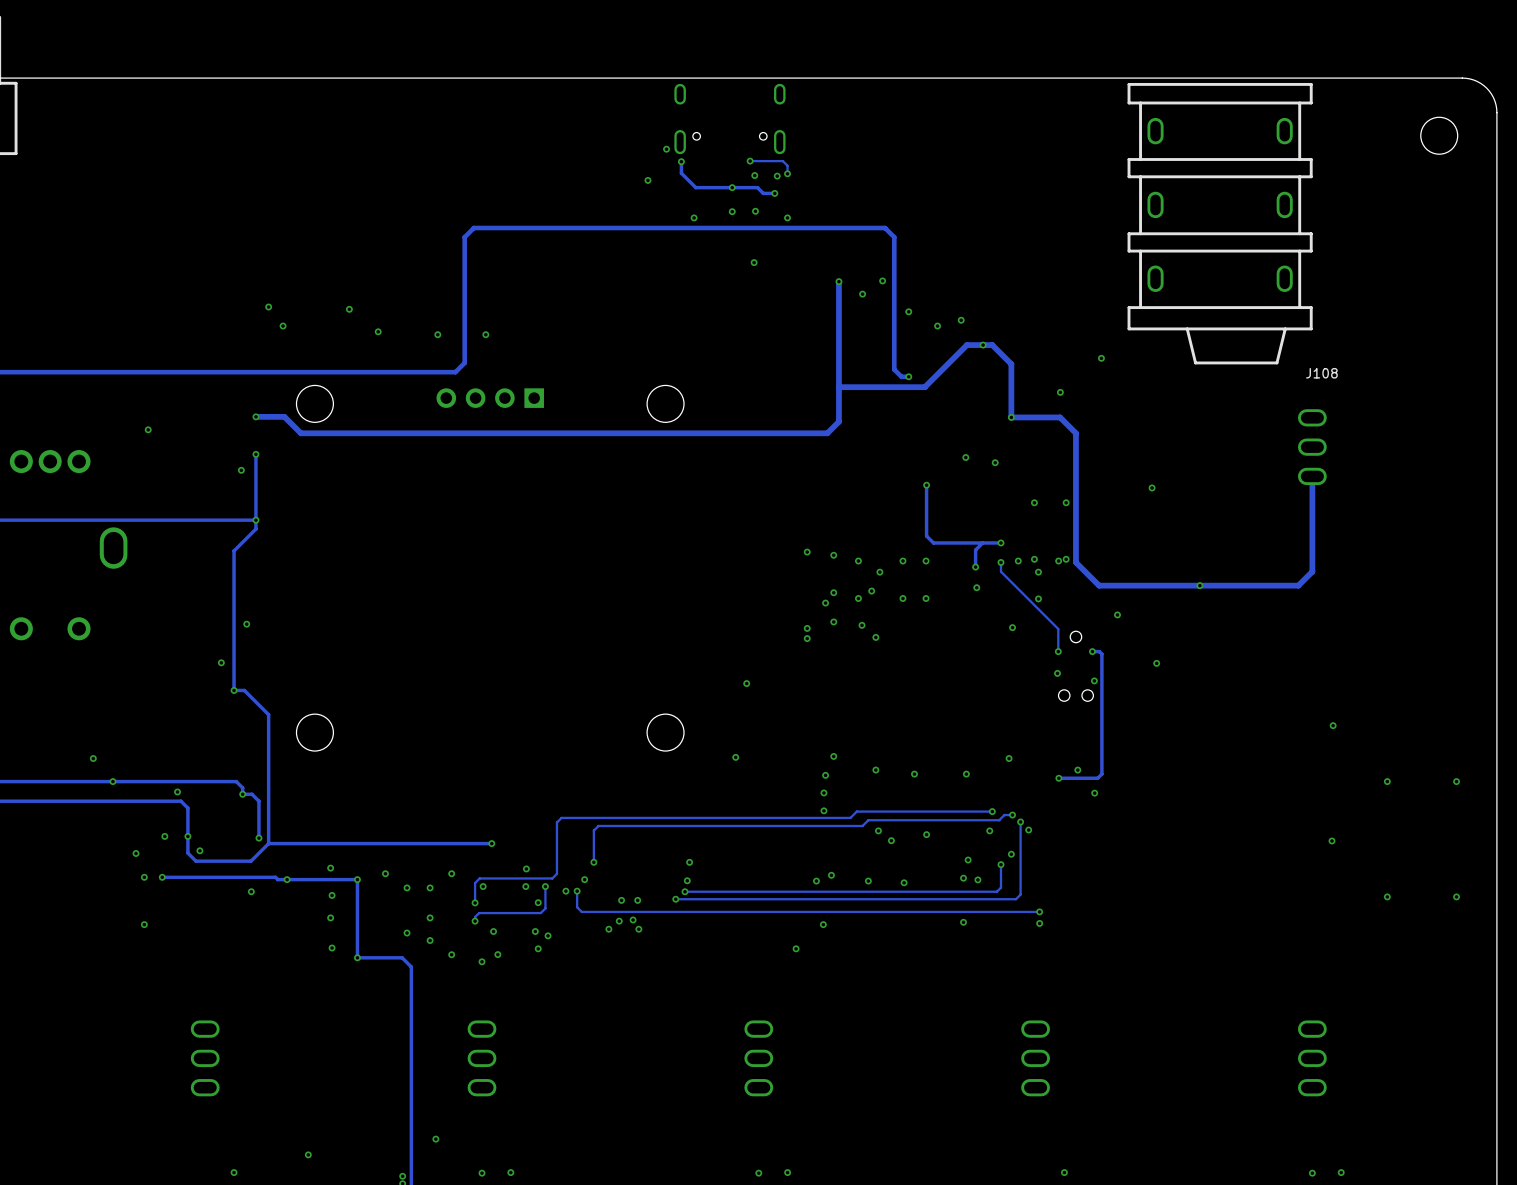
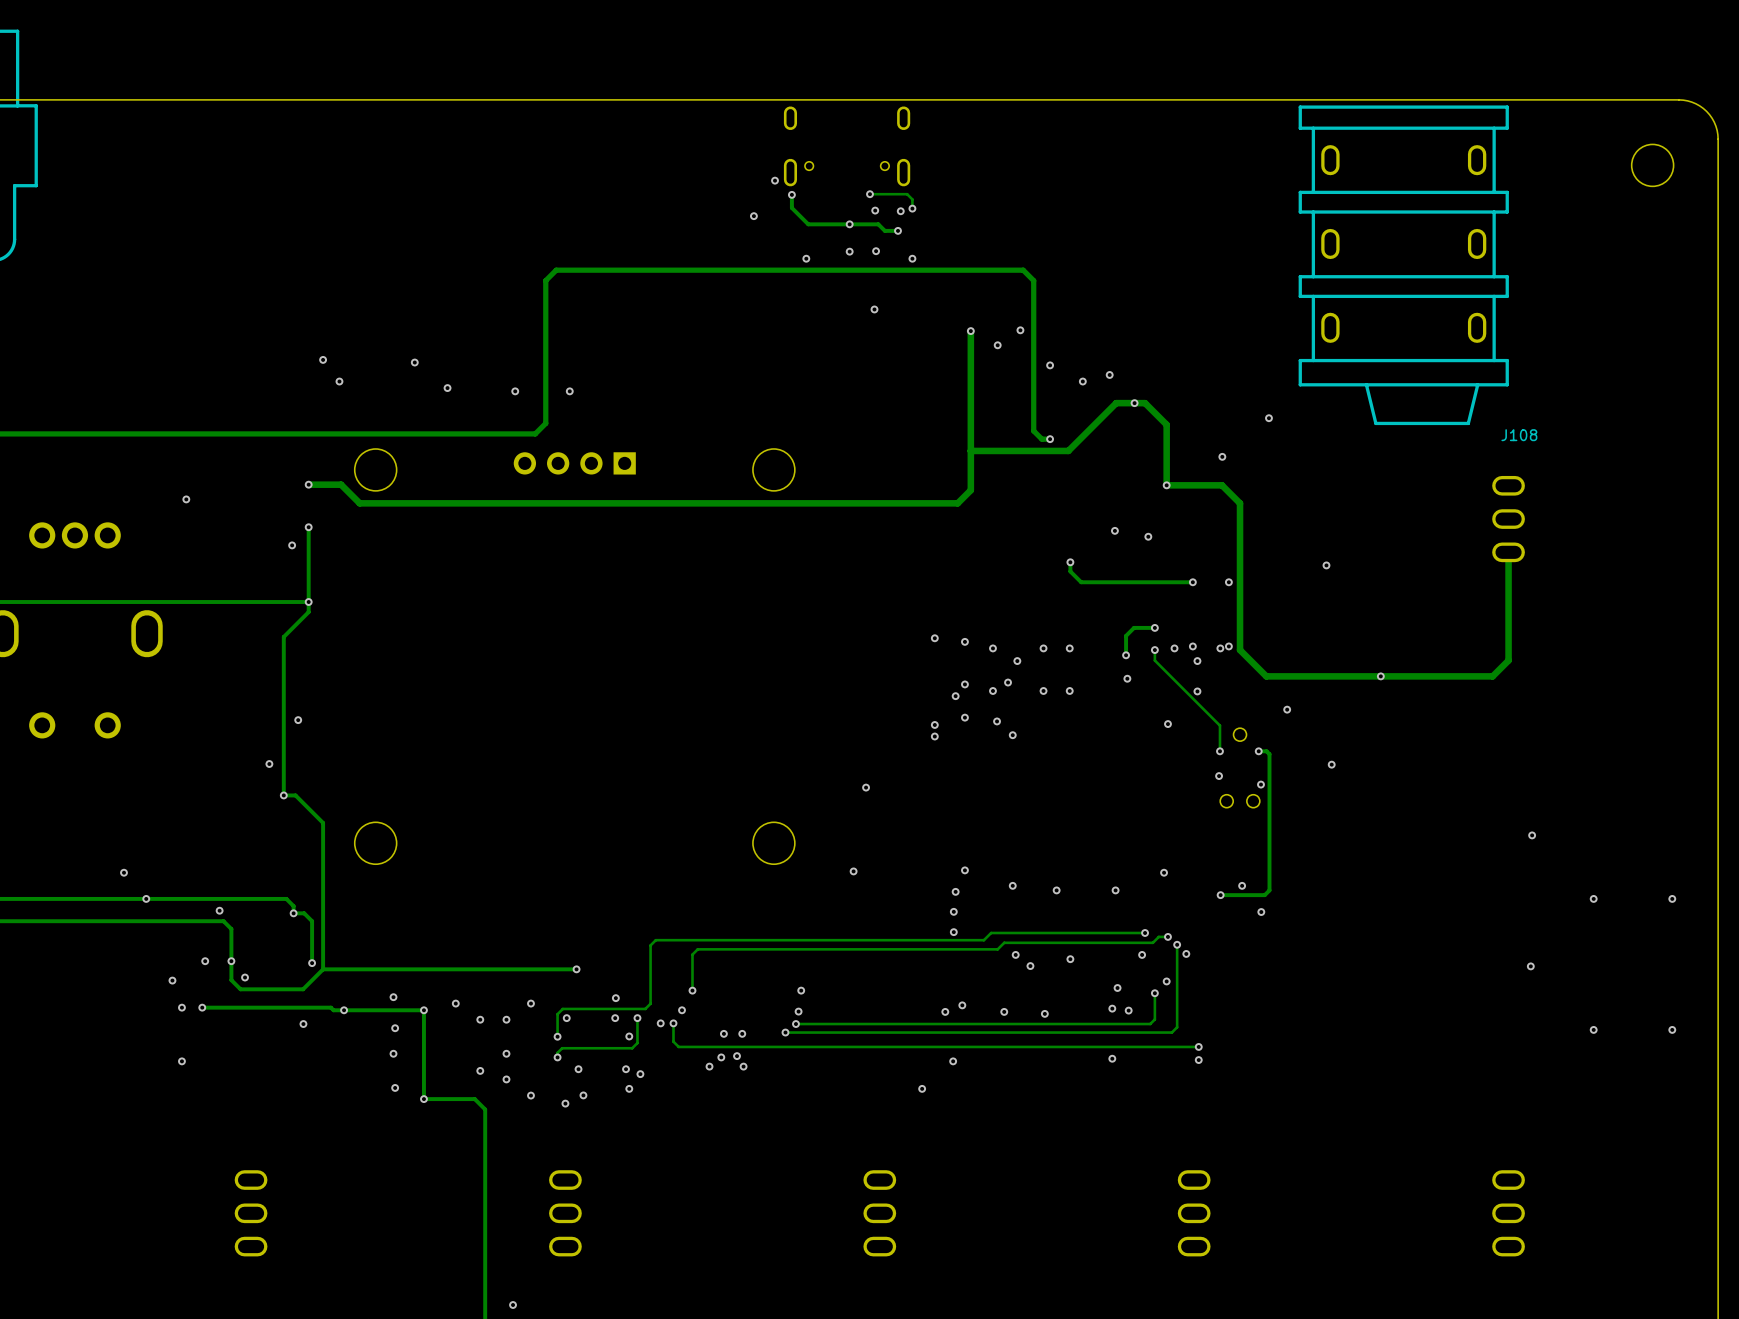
track: (926, 493) (926, 536) (933, 542) (982, 542) -> (1070, 571) (1081, 582) (1192, 582)

